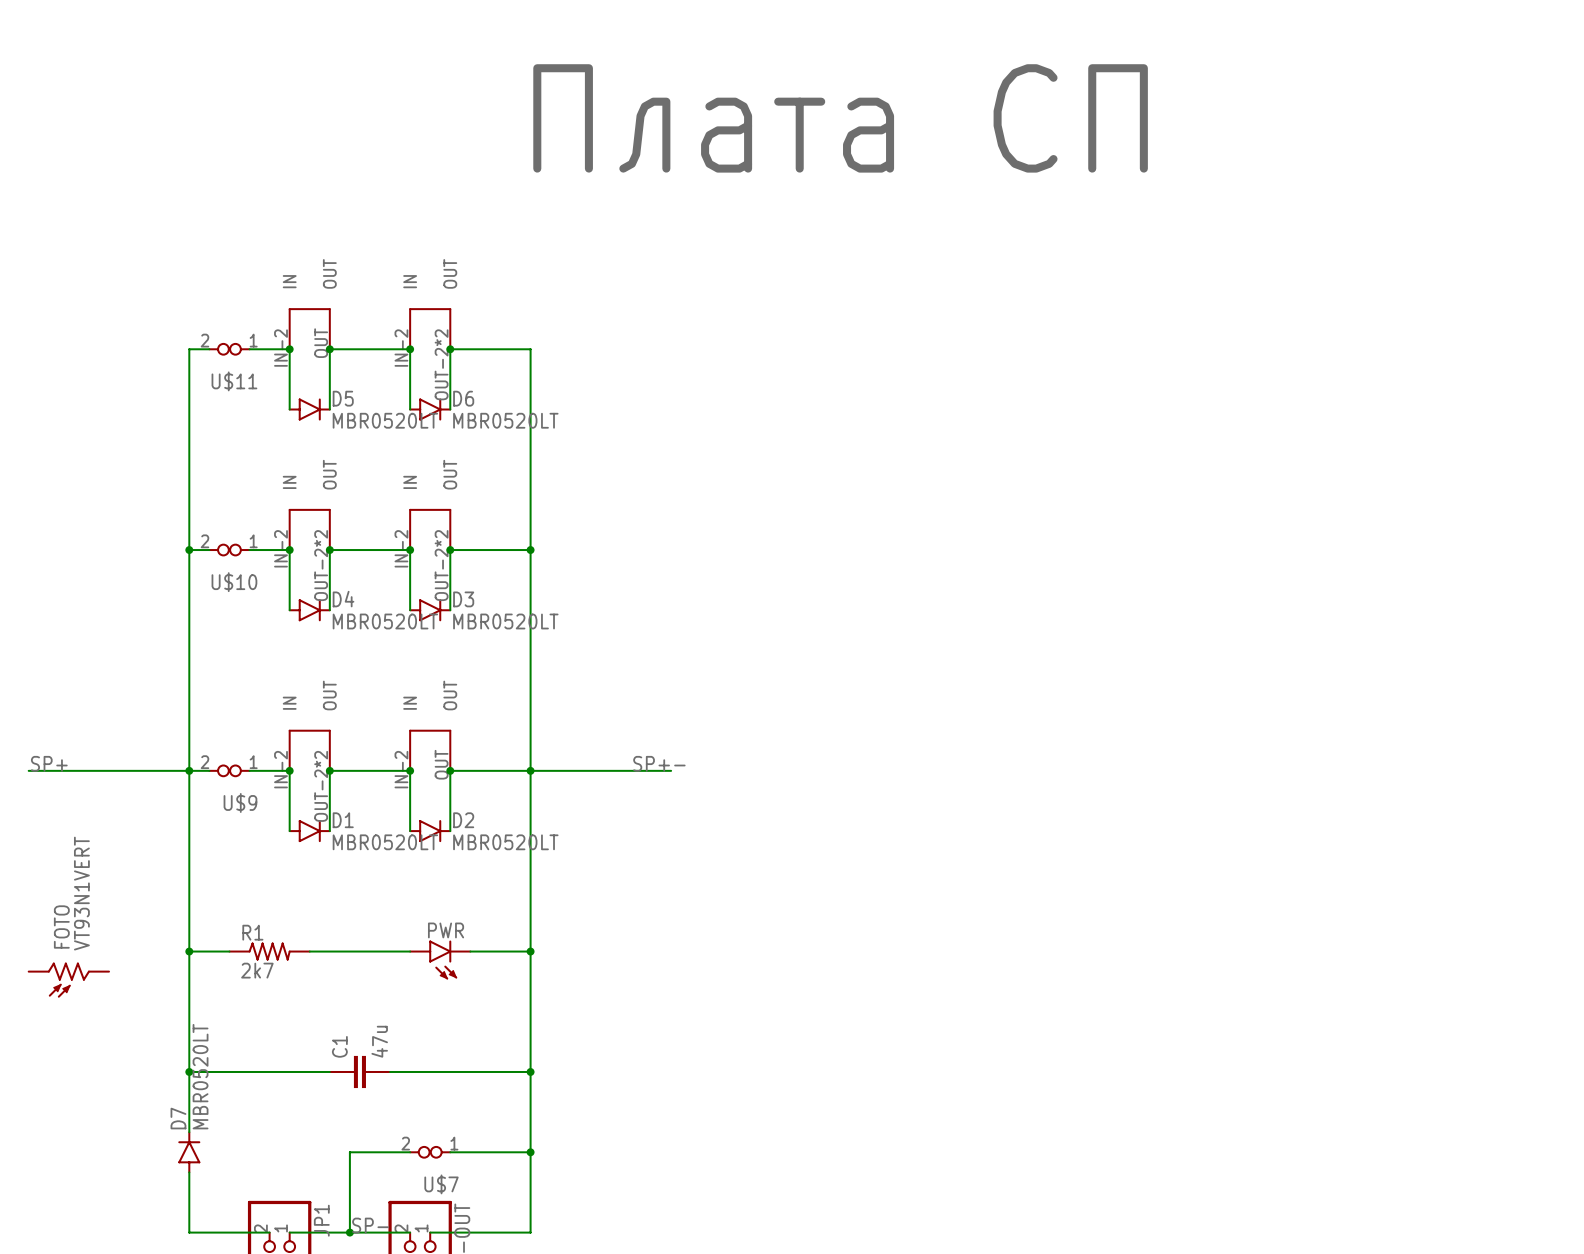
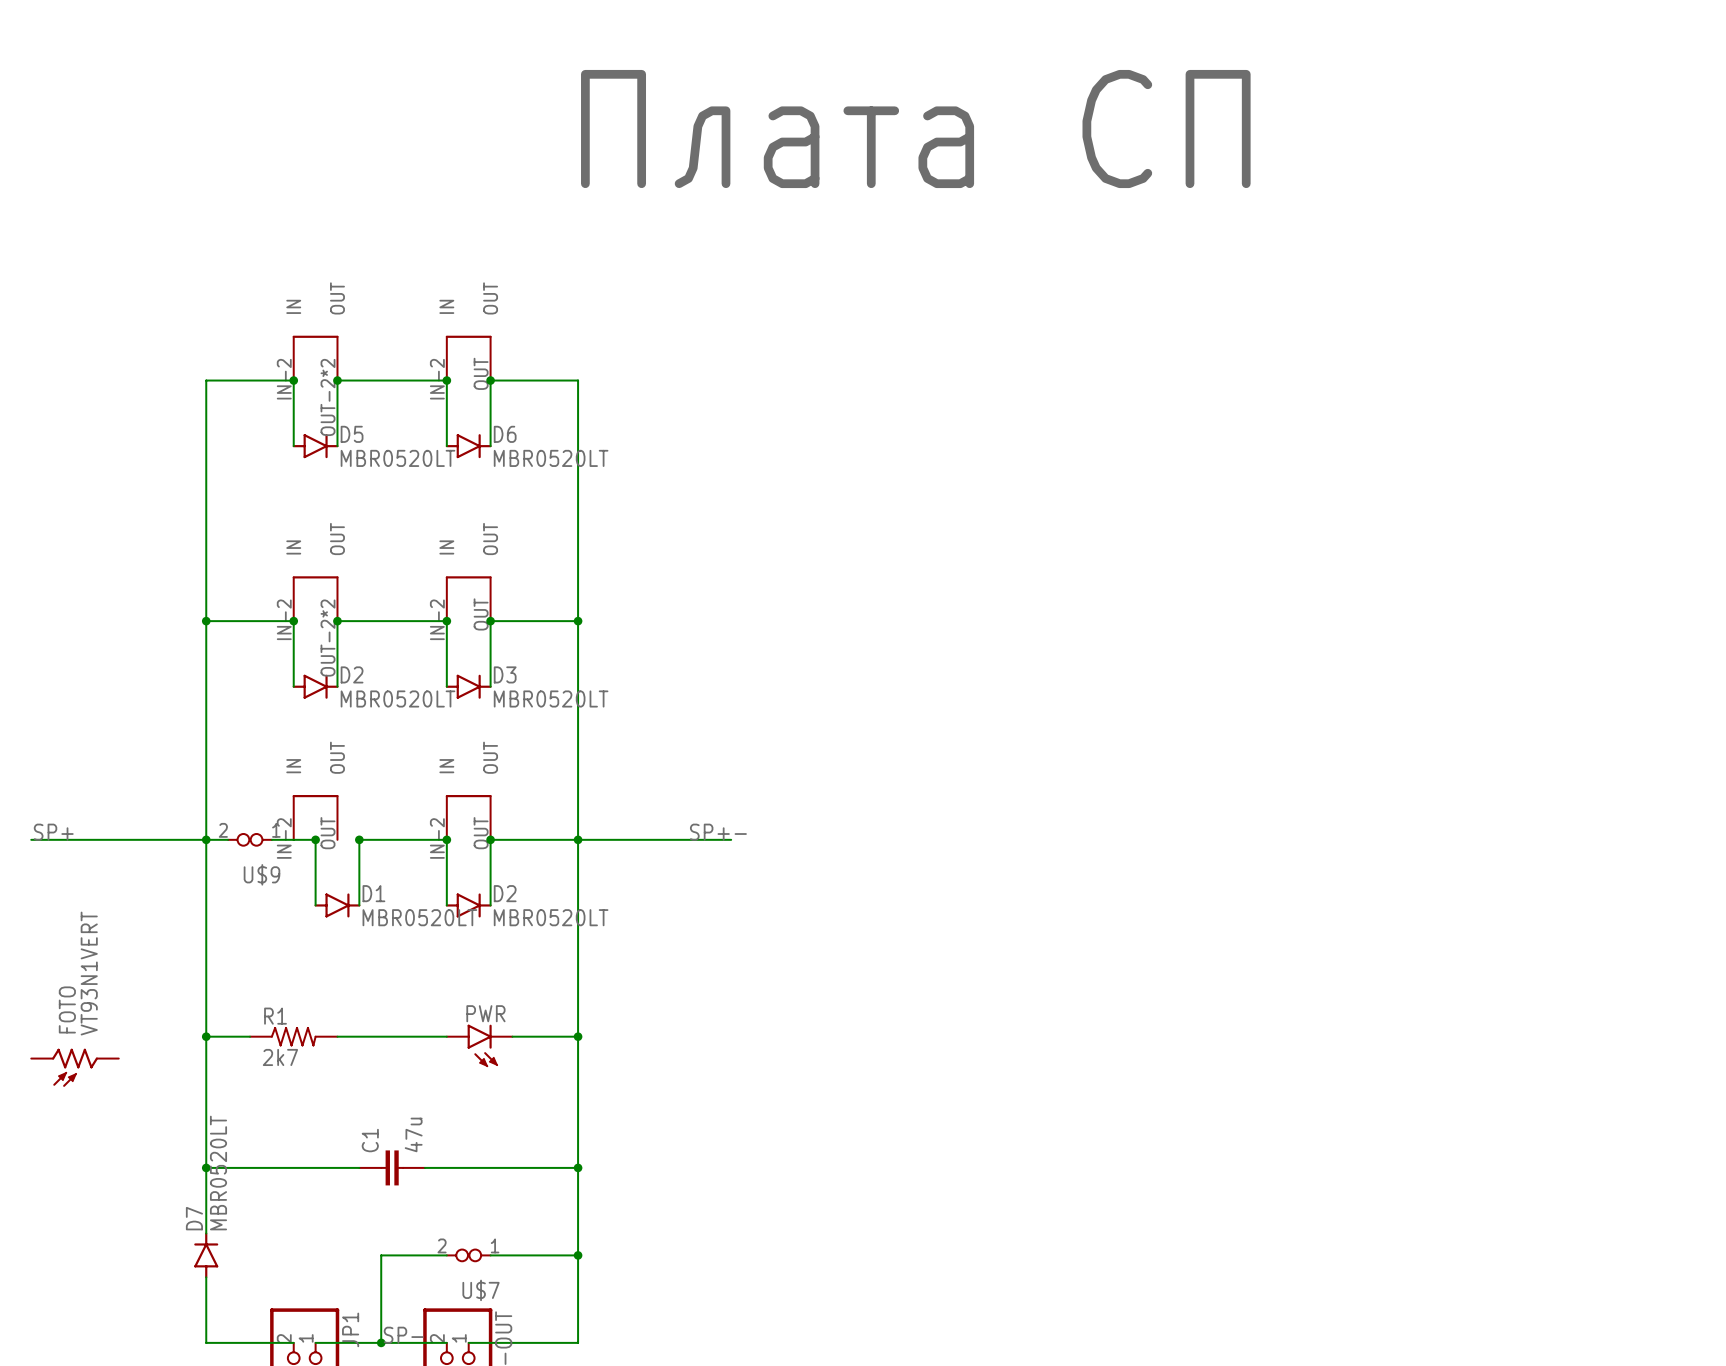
part: none -> (315, 358)
part: (309, 328) -> none
U$11: (229, 349) -> none
wire: (269, 349) (289, 349) (289, 409) -> (293, 380) (293, 446)
junction: none -> (293, 380)
junction: (289, 349) -> none
junction: none -> (337, 380)
wire: (329, 349) (329, 409) -> (359, 380) (337, 380) (337, 446)
junction: (329, 349) -> none
part pin number: OUT-2*2 (441, 364) -> OUT (481, 373)
D5 position: (309, 409) -> (315, 446)
part position: (309, 529) -> (315, 598)
part: (430, 529) -> none
part: none -> (468, 598)
wire: (189, 550) (209, 550) -> none
junction position: (189, 550) -> (206, 621)
U$10: (229, 550) -> none
wire: (249, 550) (289, 550) (289, 610) -> none
junction: (289, 550) -> none
junction: (329, 550) -> none
junction position: (410, 550) -> (446, 621)
junction position: (450, 550) -> (490, 621)
wire: (530, 550) (450, 550) (450, 570) -> (578, 621) (490, 621)
junction position: (530, 550) -> (578, 621)
wire: none -> (206, 621) (293, 621) (293, 686)
junction: none -> (293, 621)
junction: none -> (337, 621)
wire: (410, 570) (410, 550) (329, 550) (329, 610) -> (446, 621) (337, 621) (337, 686)
D4: MBR0520LT (309, 610) -> none
wire: none -> (446, 664) (446, 686)
D3 position: (430, 610) -> (468, 686)
wire: none -> (490, 664) (490, 686)
D2: none -> MBR0520LT (315, 686)
part: none -> (315, 817)
part: (309, 750) -> none

